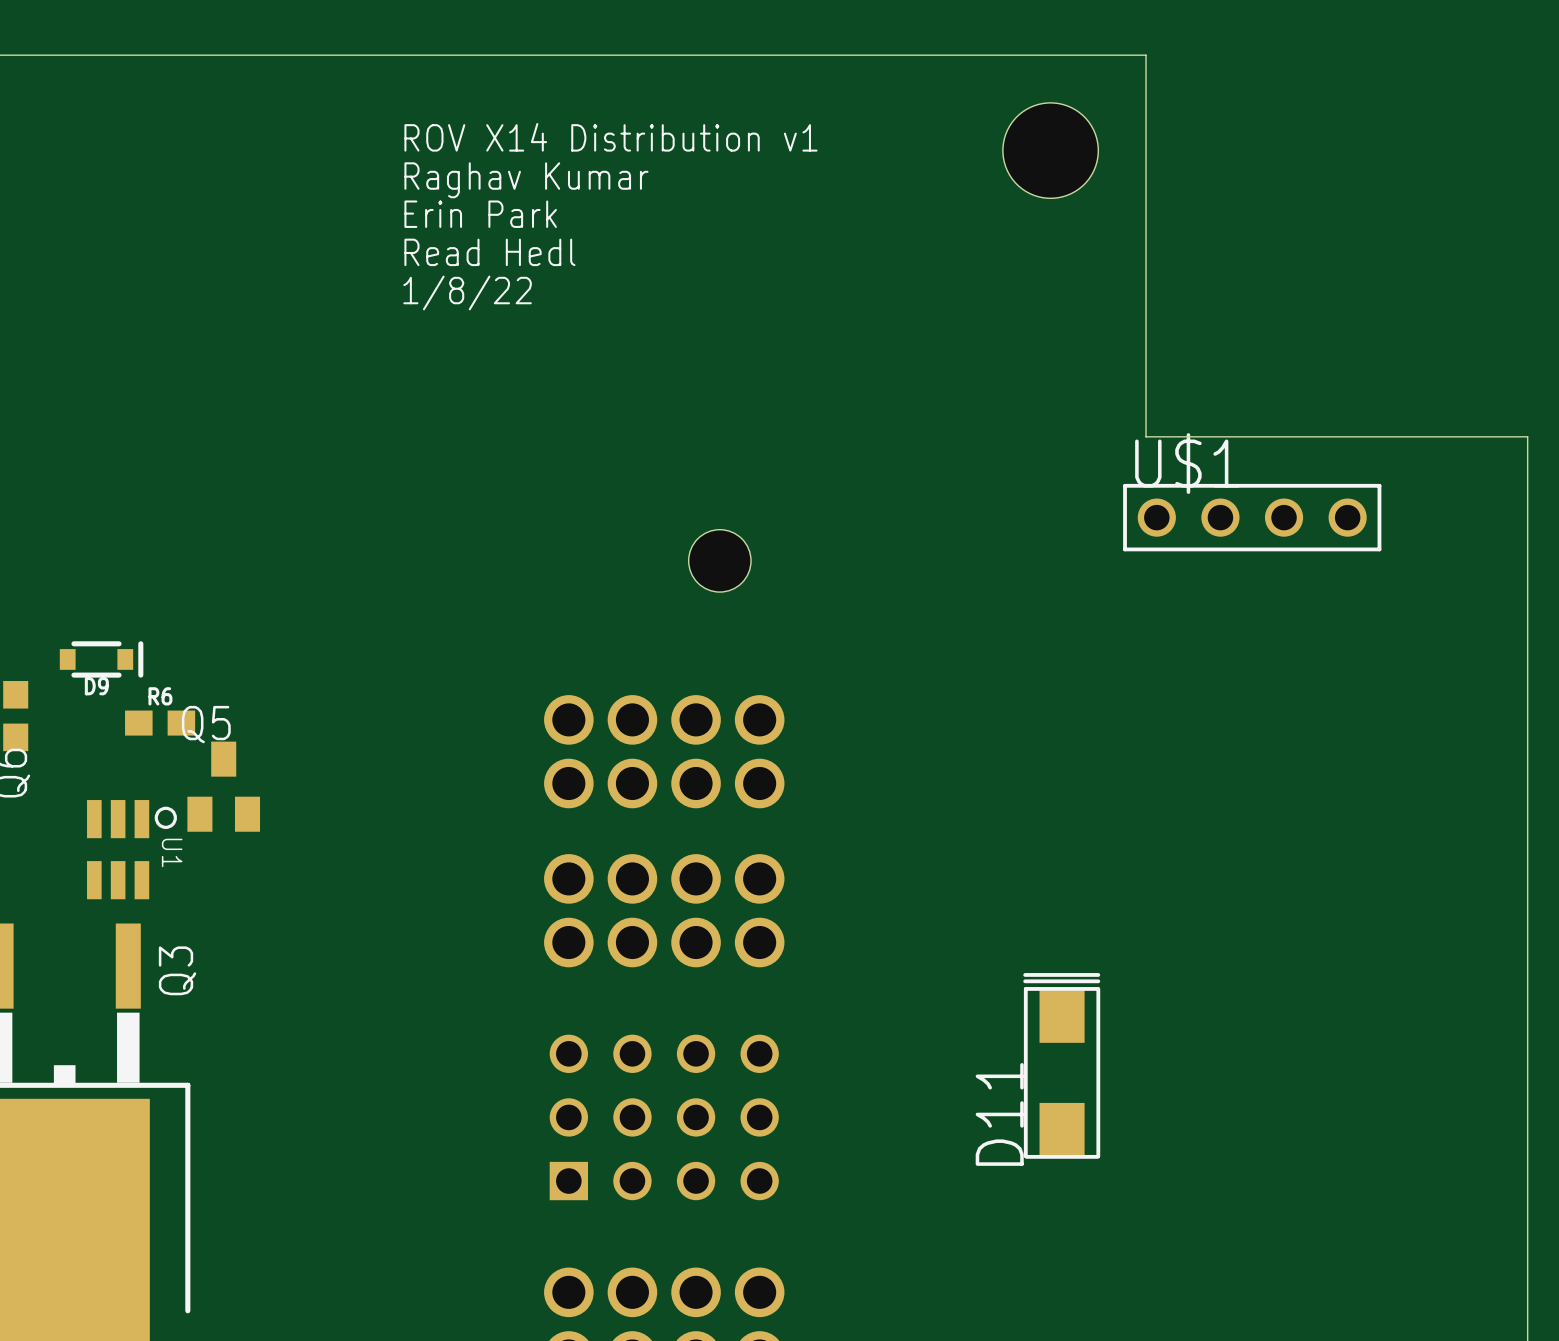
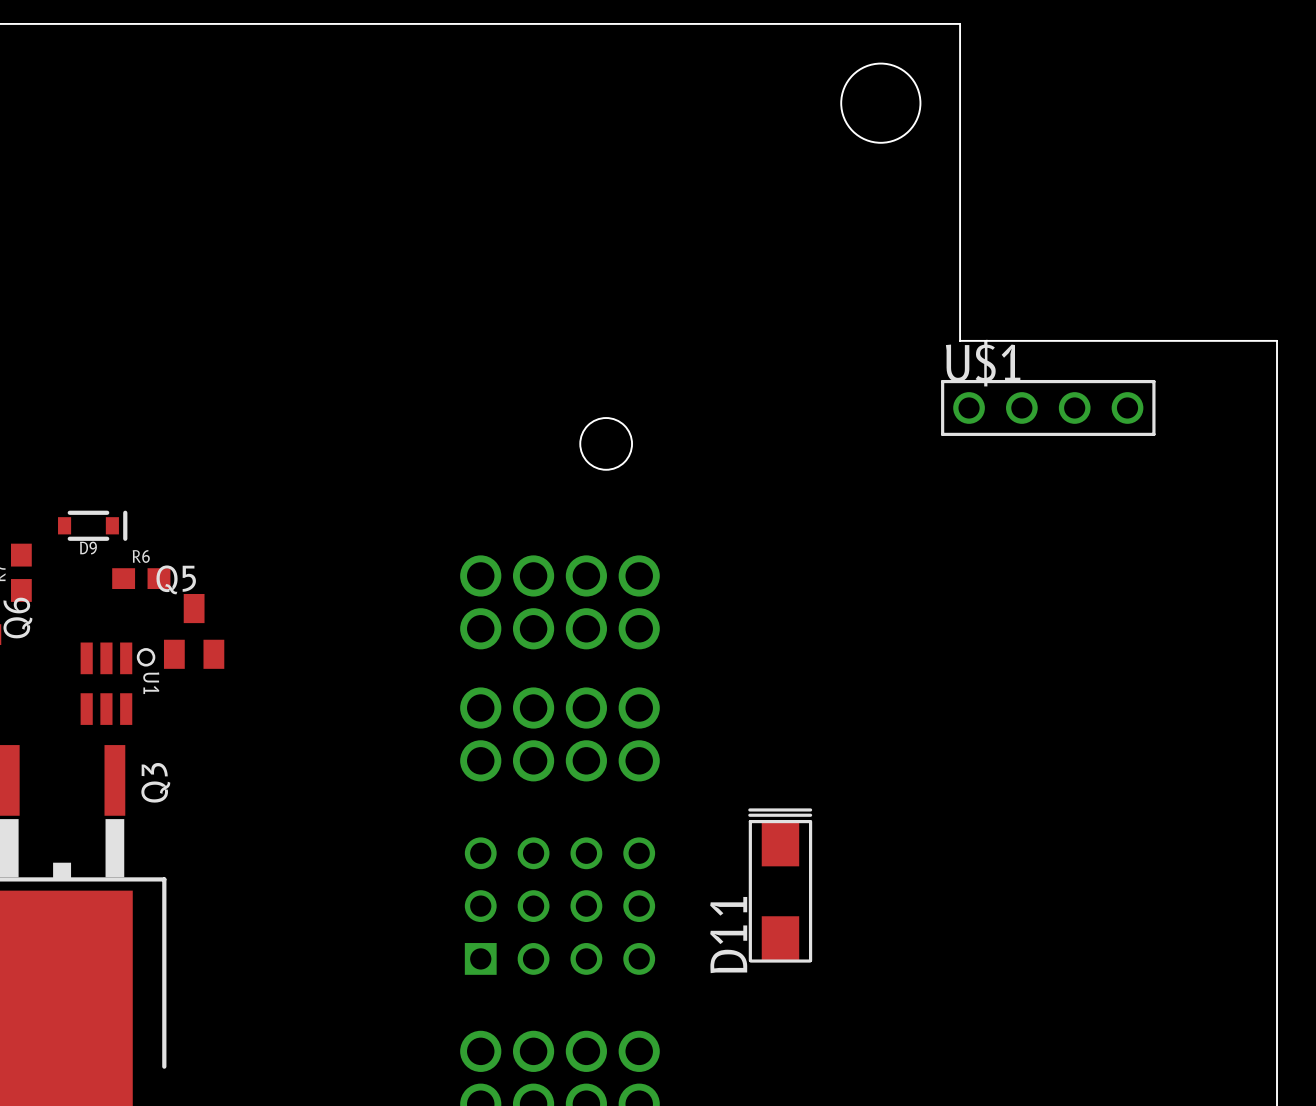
text: ROV X14 Distribution v1 (610, 137) -> none
text: Raghav Kumar (526, 180) -> none
text: Erin Park (480, 214) -> none
text: Read Hedl (489, 252) -> none
text: 1/8/22 (467, 292) -> none
D11 position: (1061, 1065) -> (780, 885)

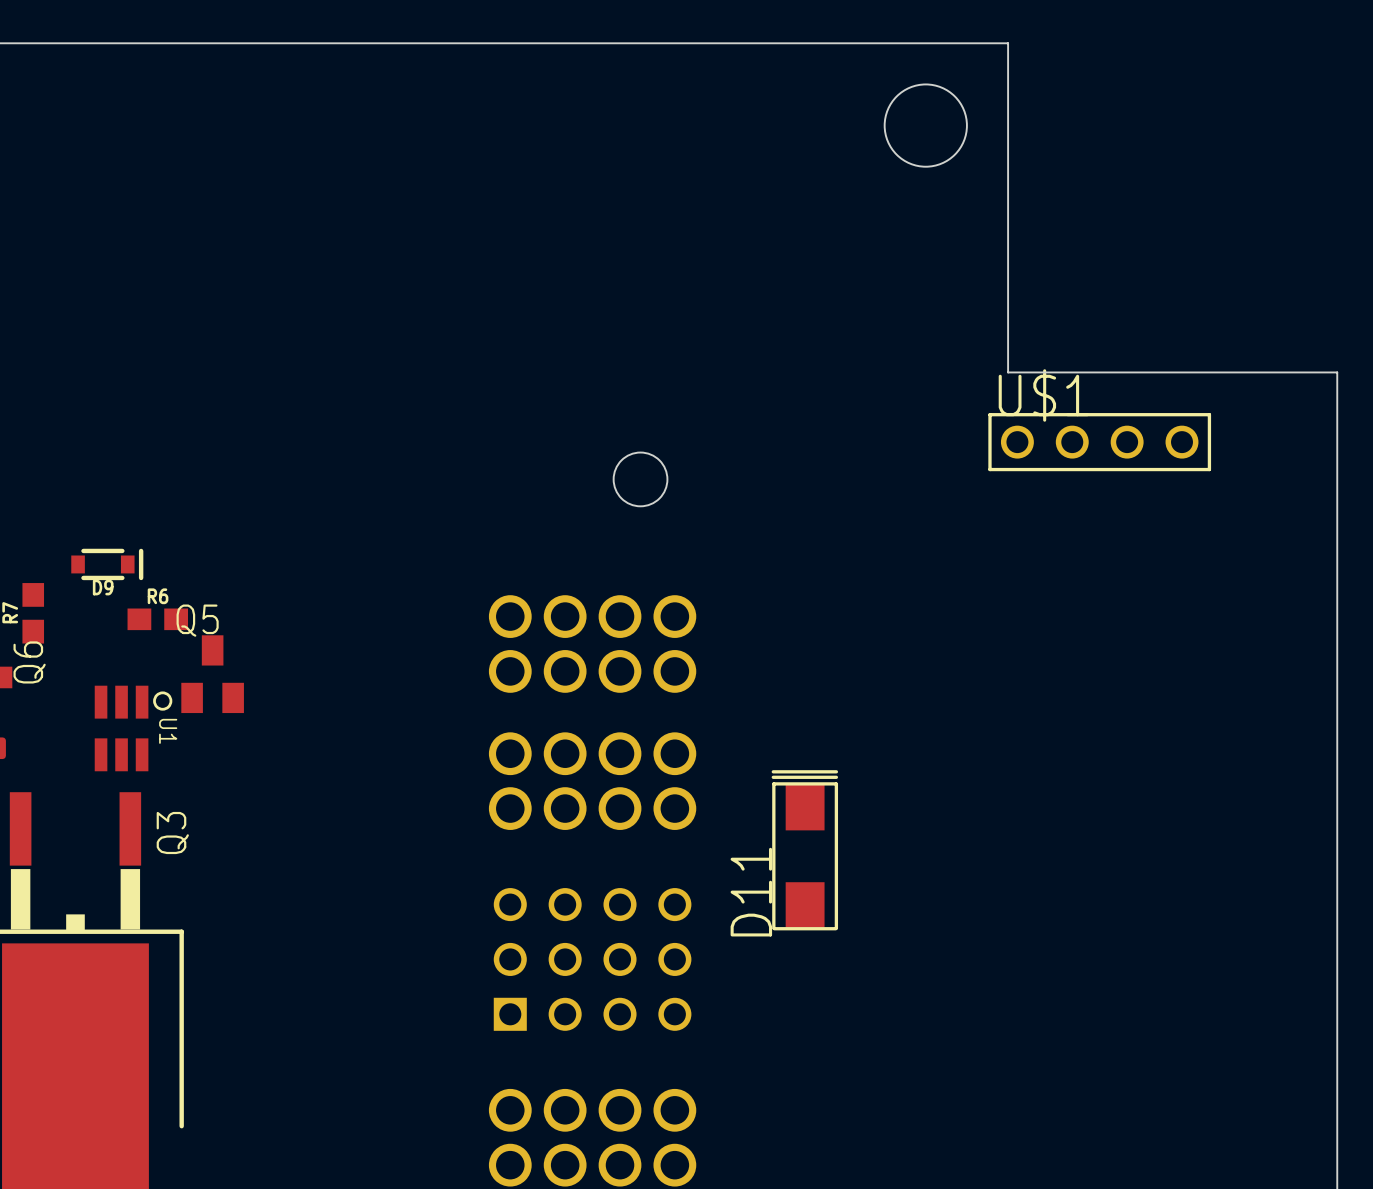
D11 position: (780, 885) -> (804, 850)

